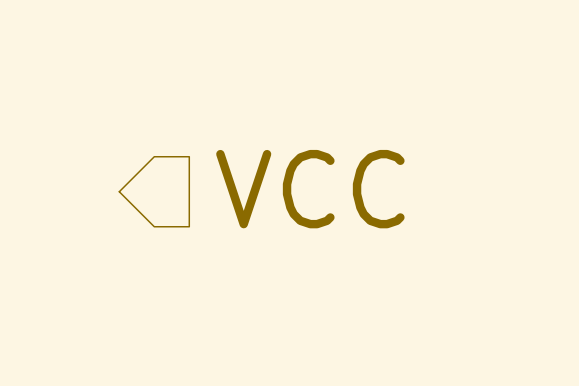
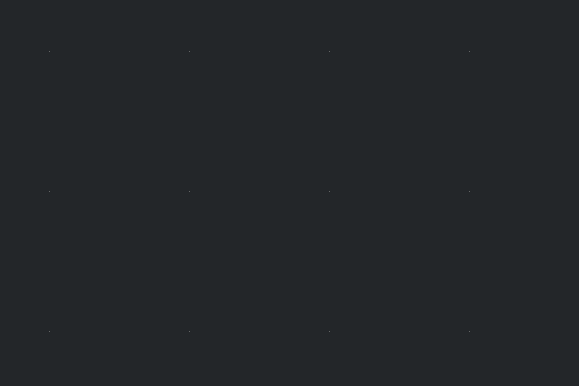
hierarchical label: VCC (310, 189) -> none

